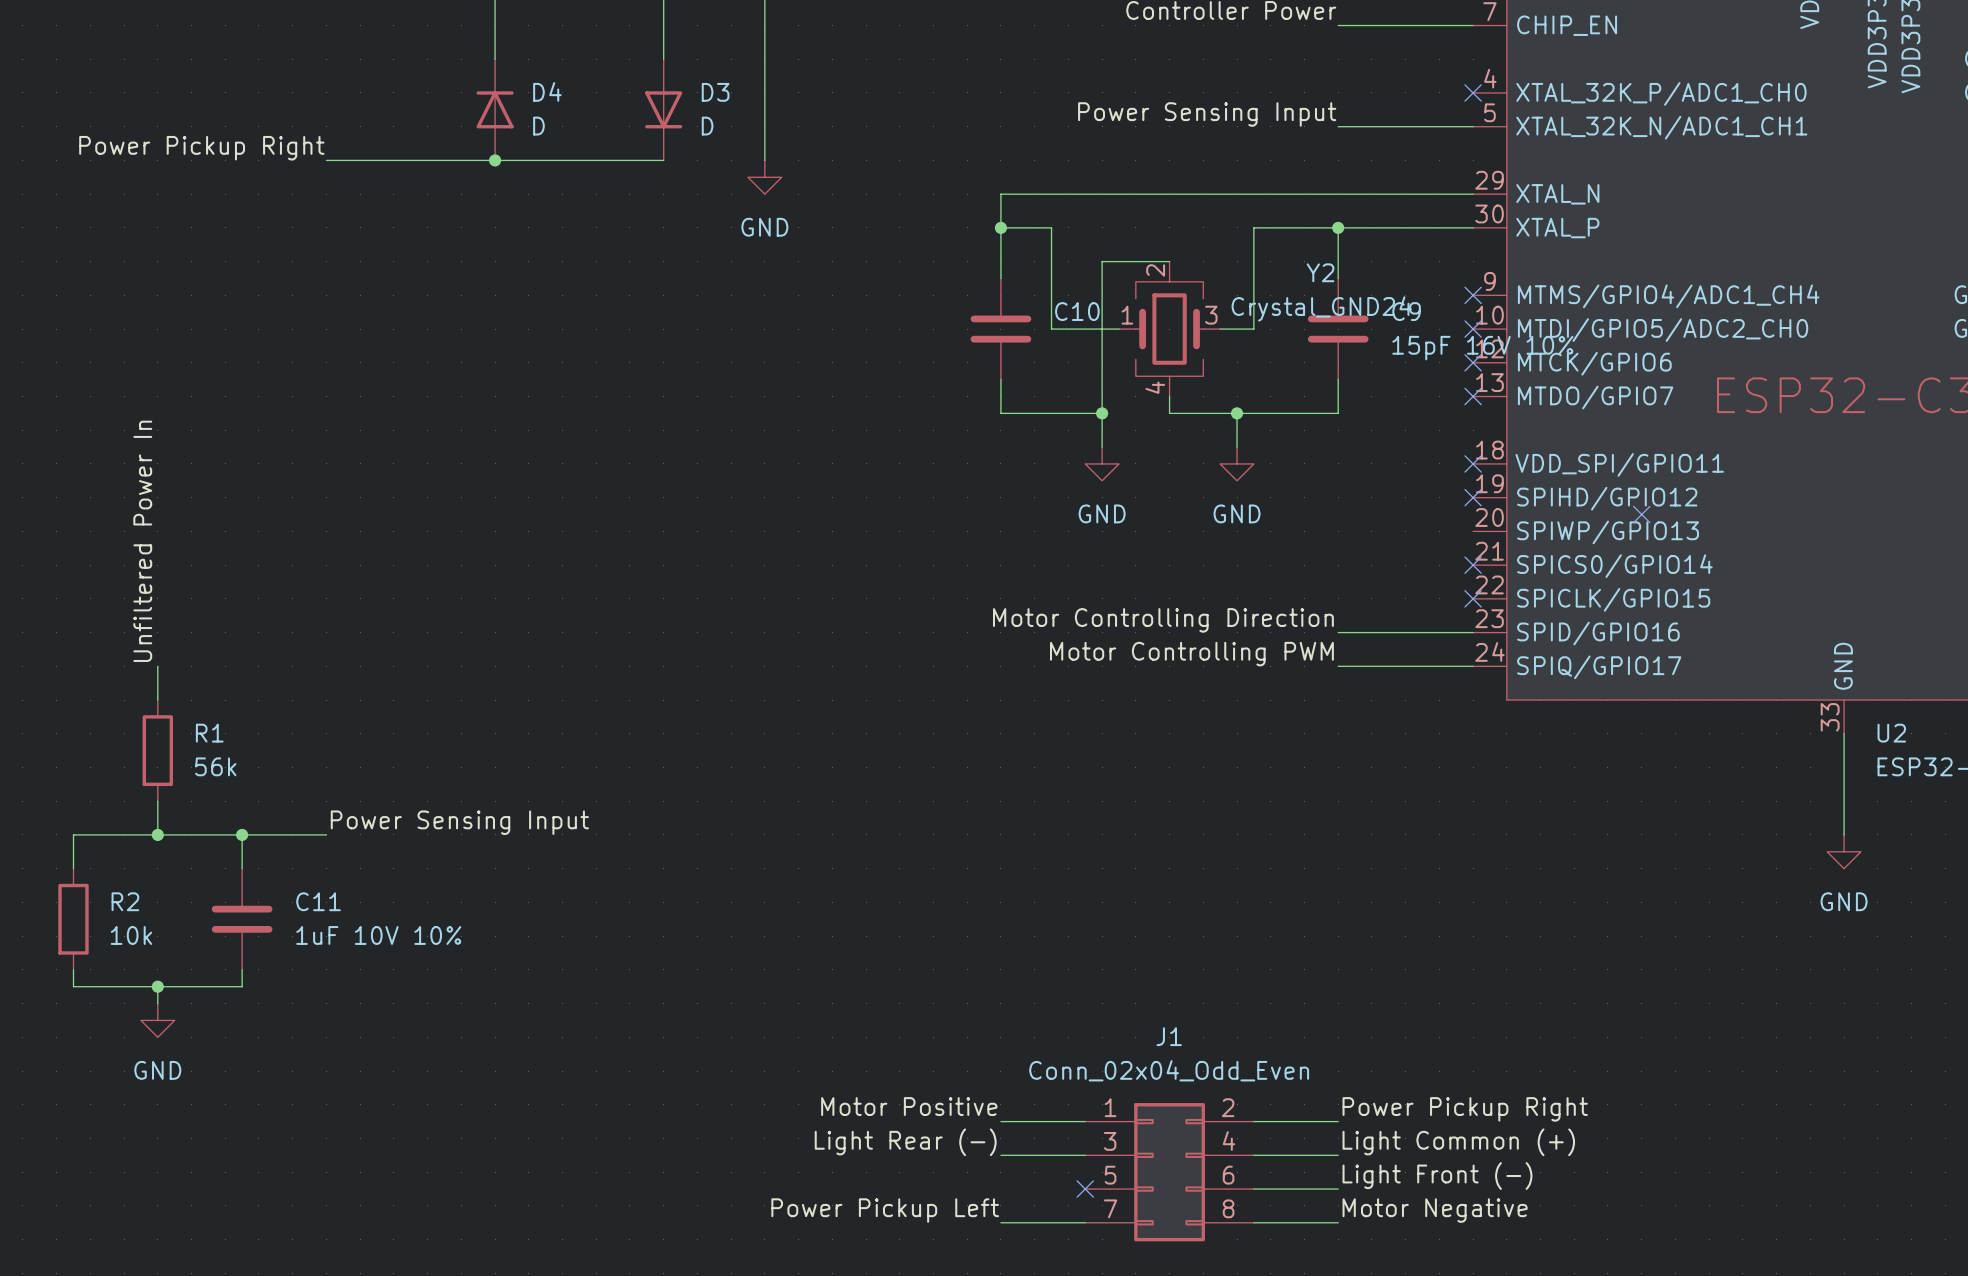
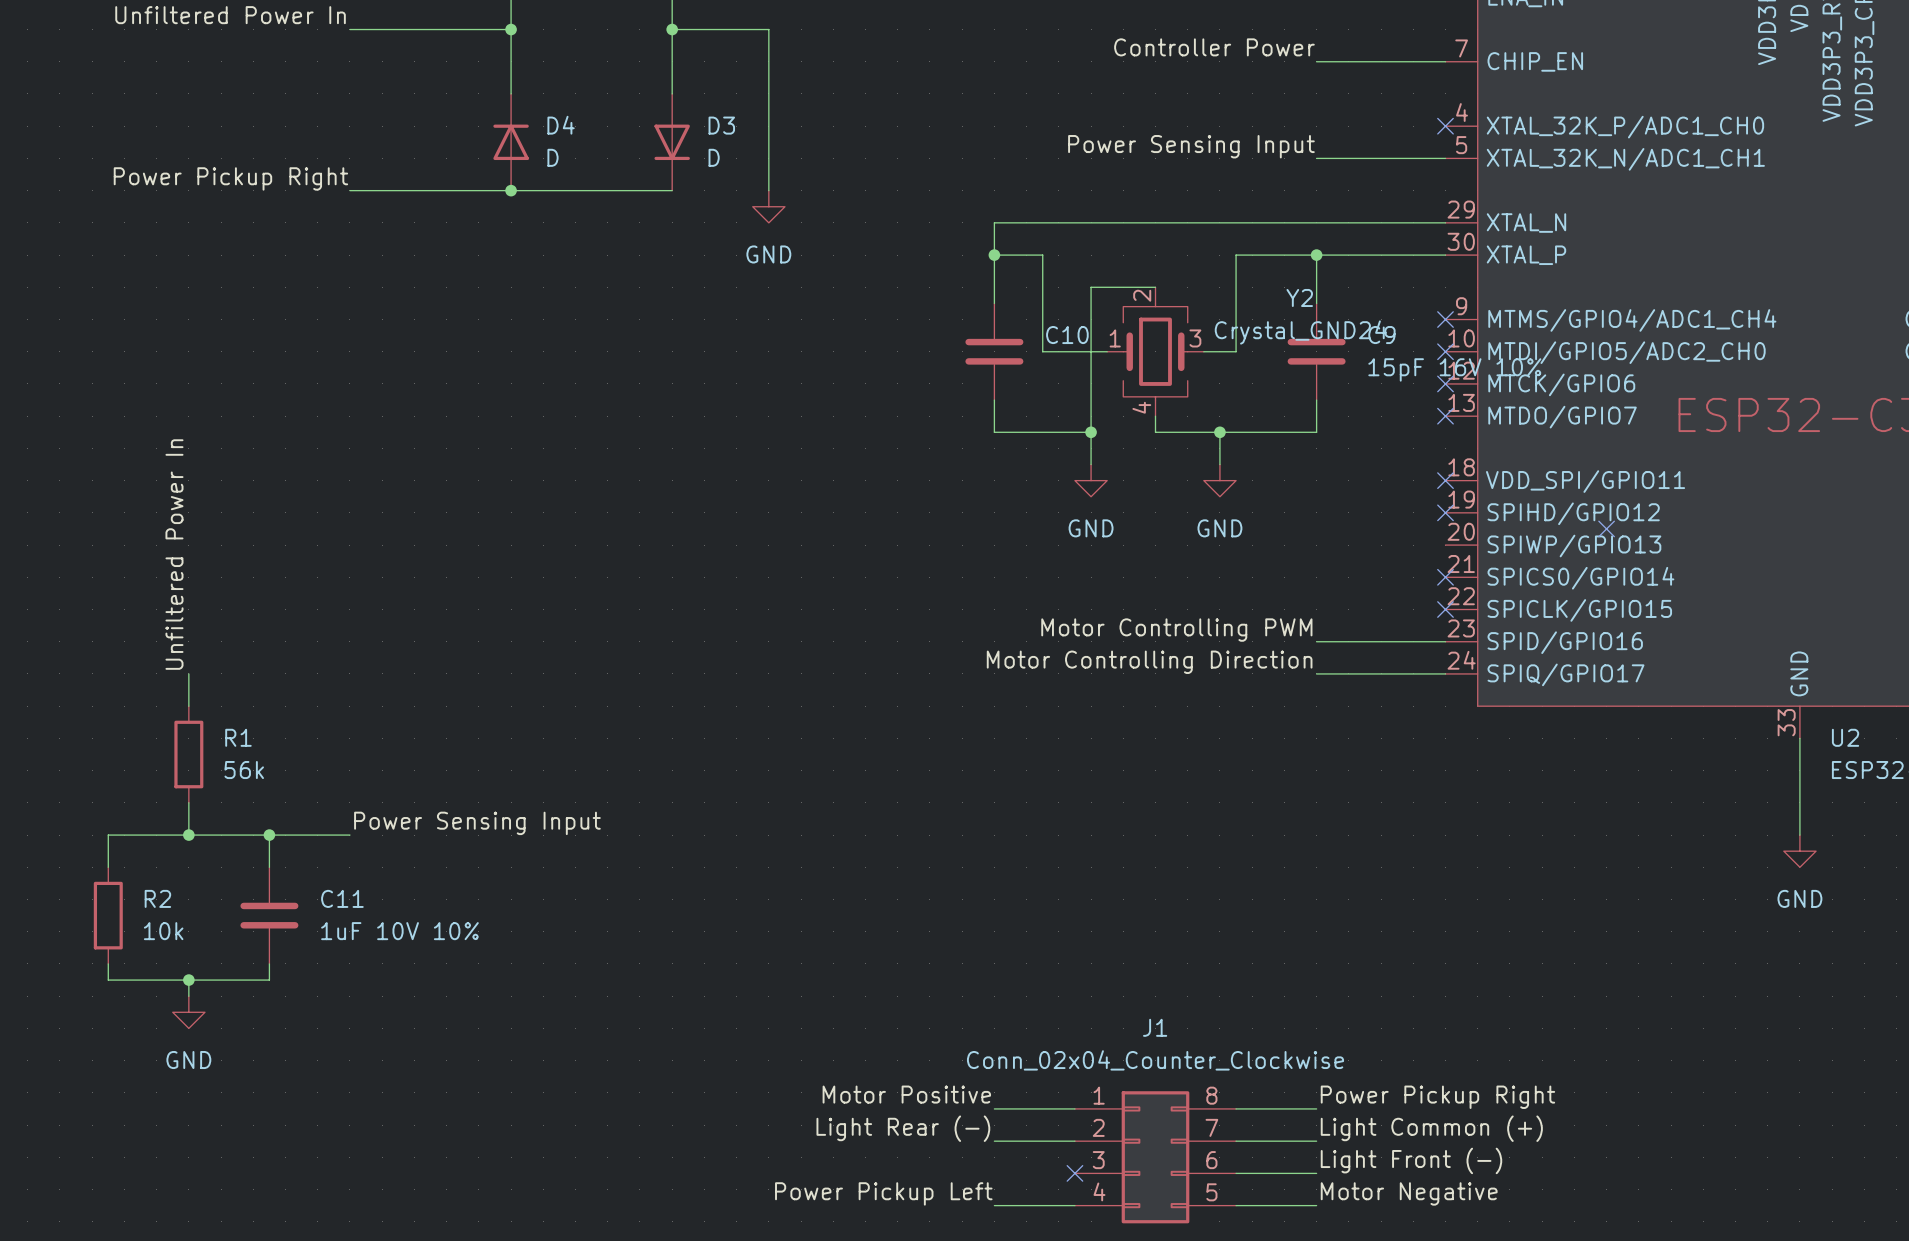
label: Motor Controlling Direction (1163, 620) -> Motor Controlling PWM (1176, 630)
label: Motor Controlling PWM (1191, 654) -> Motor Controlling Direction (1149, 662)
J1 value: Conn_02x04_Odd_Even (1169, 1070) -> Conn_02x04_Counter_Clockwise (1155, 1060)
J1 pin number: 2 (1228, 1107) -> 8 (1211, 1095)
J1 pin number: 3 (1110, 1141) -> 2 (1098, 1127)
J1 pin number: 4 (1228, 1141) -> 7 (1211, 1127)
J1 pin number: 5 (1110, 1175) -> 3 (1098, 1160)
J1 pin number: 7 (1110, 1208) -> 4 (1099, 1191)
J1 pin number: 8 (1228, 1208) -> 5 (1211, 1192)

